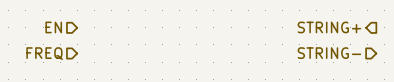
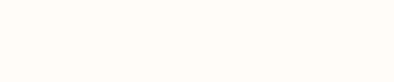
hierarchical label: EN (53, 27) -> none
hierarchical label: STRING+ (329, 27) -> none
hierarchical label: FREQ (44, 53) -> none
hierarchical label: STRING- (329, 53) -> none

